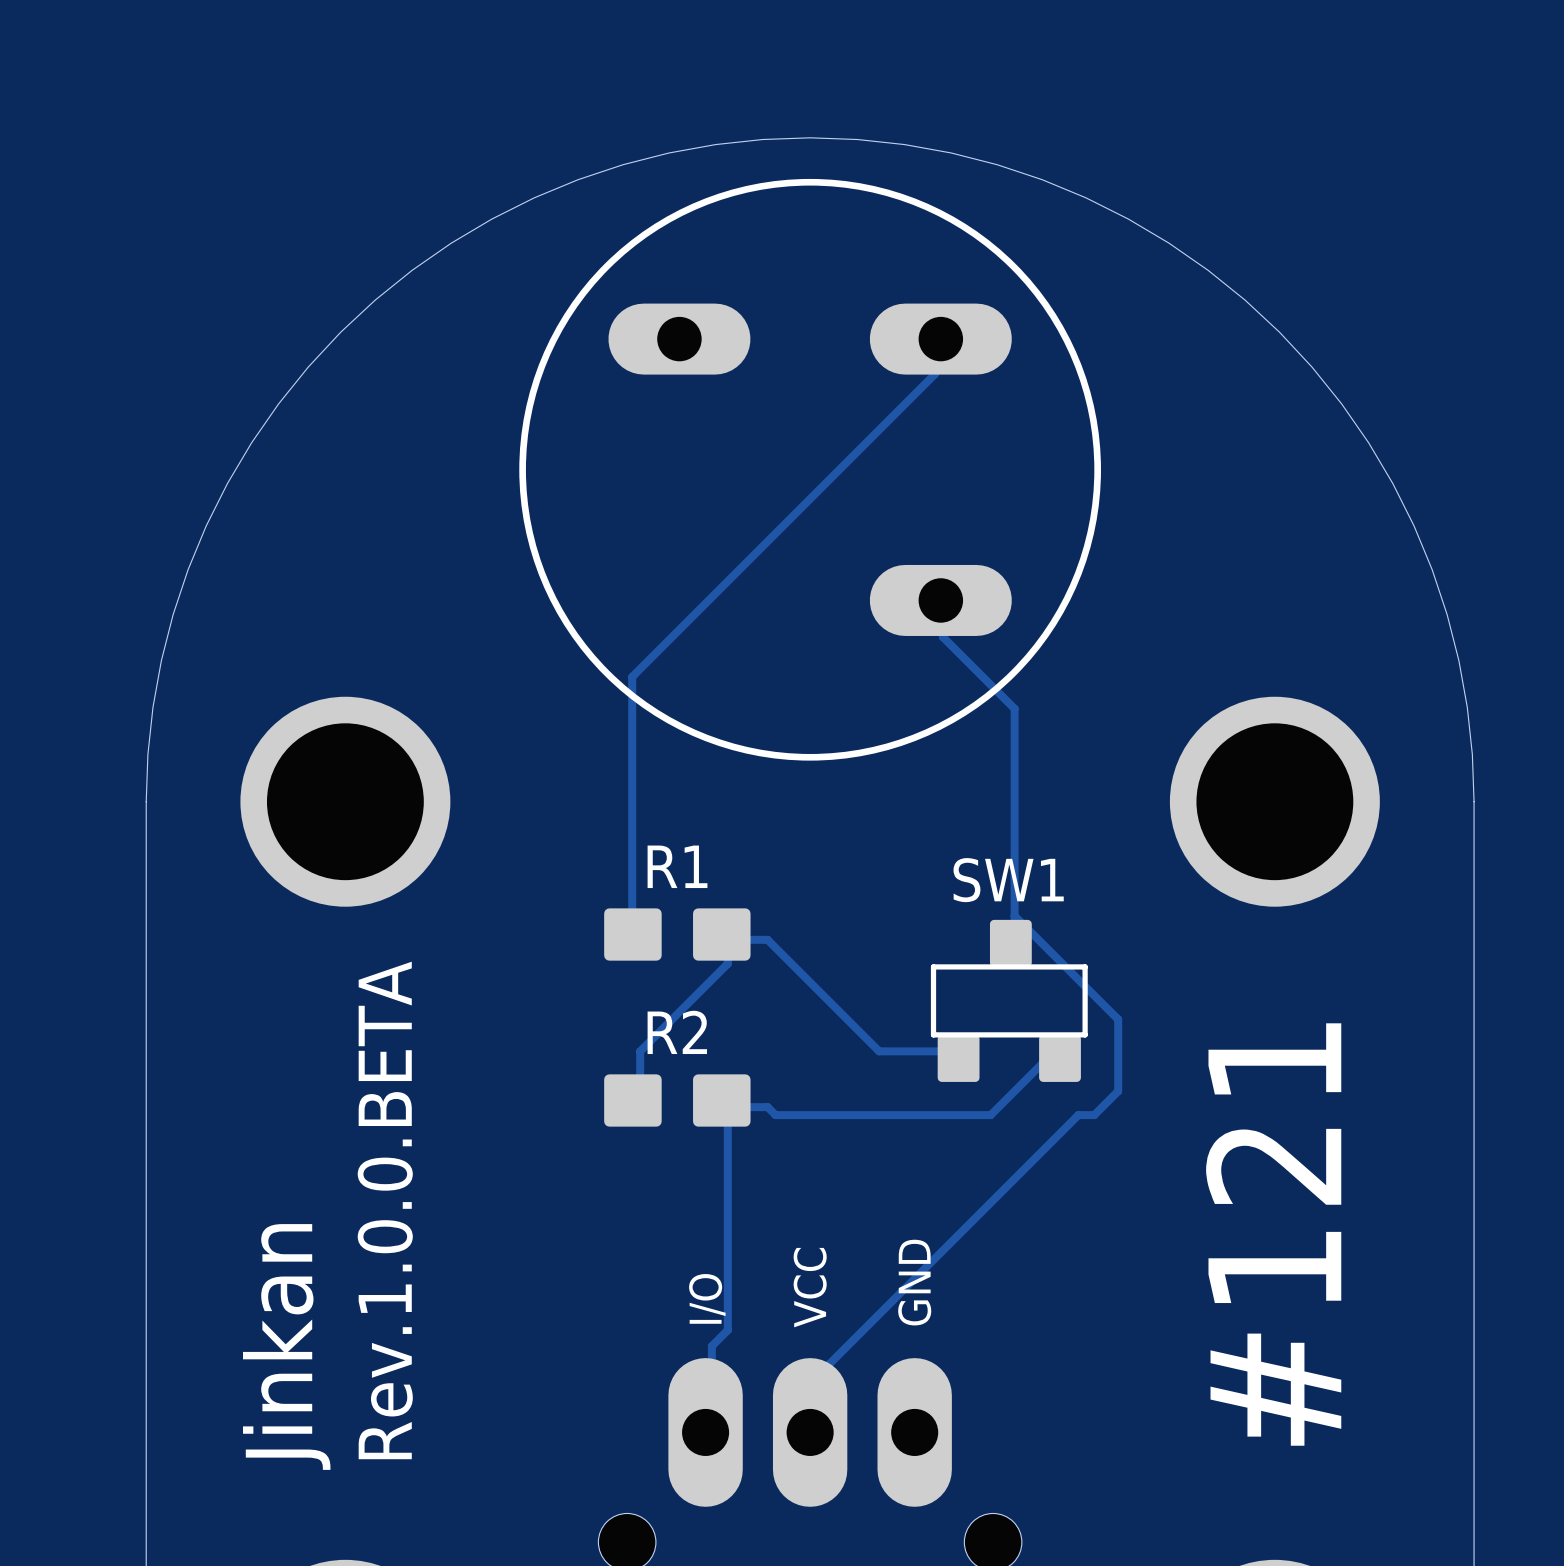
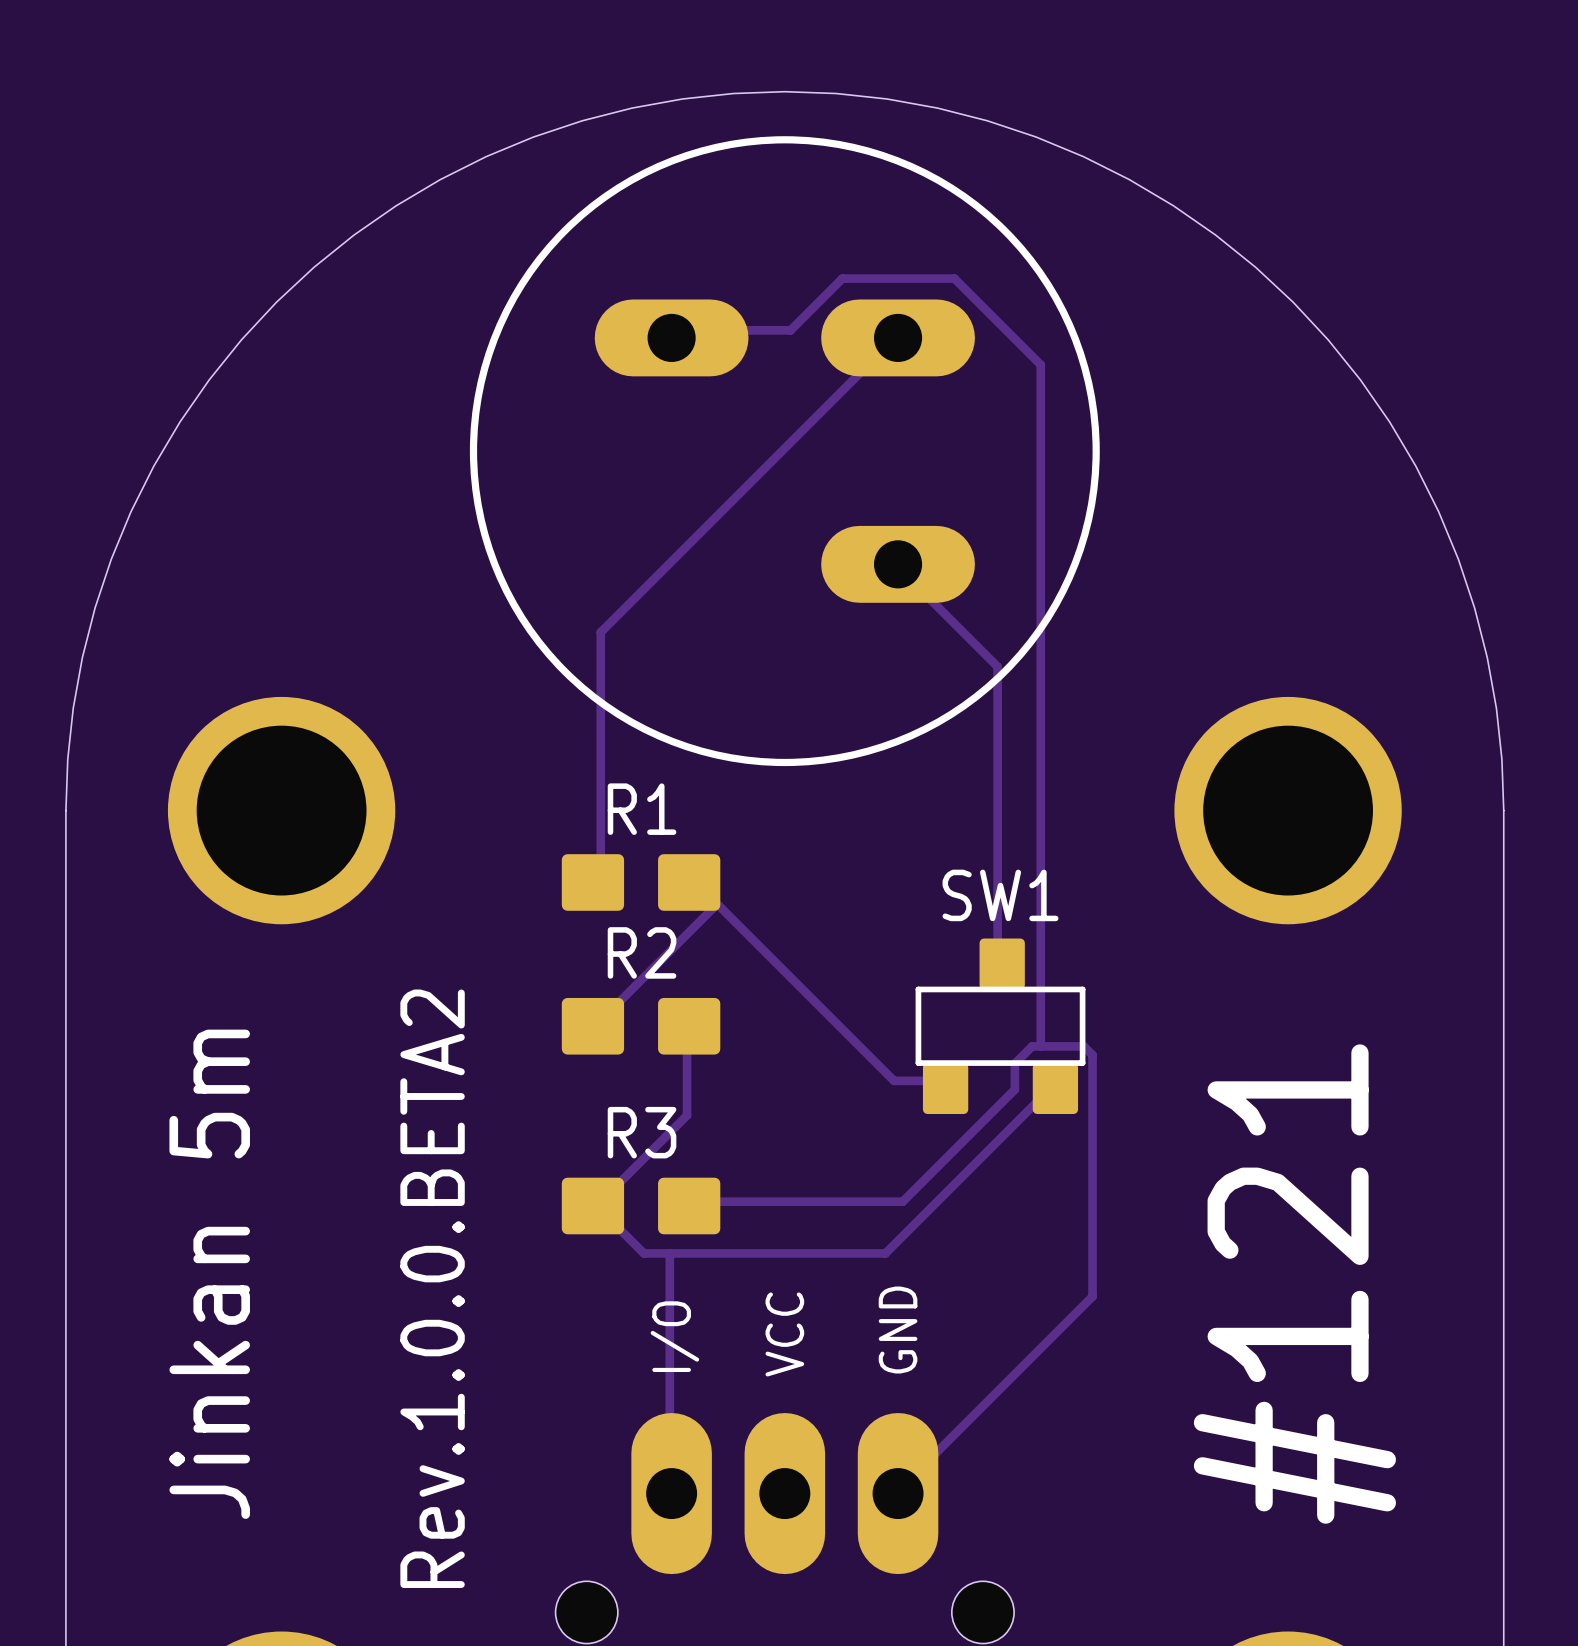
part footprint: [519, 178, 1101, 761] -> [469, 136, 1100, 767]
track: (940, 339) (934, 342) (934, 374) (632, 676) (632, 934) -> none
track: none -> (671, 337) (678, 330) (790, 330) (842, 278) (954, 278) (1040, 364) (1040, 1046)
track: none -> (898, 337) (894, 338) (600, 632) (600, 882) (592, 882)
track: (940, 600) (942, 605) (942, 637) (1014, 708) (1014, 939) (1010, 943) -> (898, 564) (902, 571) (997, 666) (997, 960) (1002, 964)
track: (1014, 915) (1118, 1019) (1118, 1091) (1094, 1115) (1078, 1115) (815, 1378) (815, 1425) (810, 1432) -> none
R1 position: (677, 934) -> (641, 882)
track: (727, 939) (767, 939) (879, 1051) (911, 1051) -> (592, 1026) (712, 908) (712, 899) (689, 882) (695, 882) (894, 1080)
track: (727, 939) (727, 963) (640, 1051) (640, 1099) (632, 1100) -> none
track: (1054, 1059) (1046, 1059) (990, 1115) (775, 1115) (767, 1107) (727, 1107) -> (1049, 1089) (885, 1253) (643, 1253) (600, 1210) (592, 1205) (600, 1201) (687, 1115) (687, 1029) (689, 1026)
R2 position: (677, 1100) -> (641, 1026)
track: (727, 1107) (727, 1330) (711, 1346) (711, 1425) (705, 1432) -> (669, 1253) (669, 1486) (671, 1493)
R3: none -> (641, 1205)
track: none -> (689, 1205) (695, 1201) (902, 1201) (1014, 1089) (1014, 1063) (1032, 1046) (1083, 1046) (1092, 1055) (1092, 1296) (902, 1486) (898, 1493)
text: Rev.1.0.0.BETA (385, 1210) -> Rev.1.0.0.BETA2 (432, 1288)
text: Jinkan (286, 1346) -> Jinkan 5m (209, 1274)

